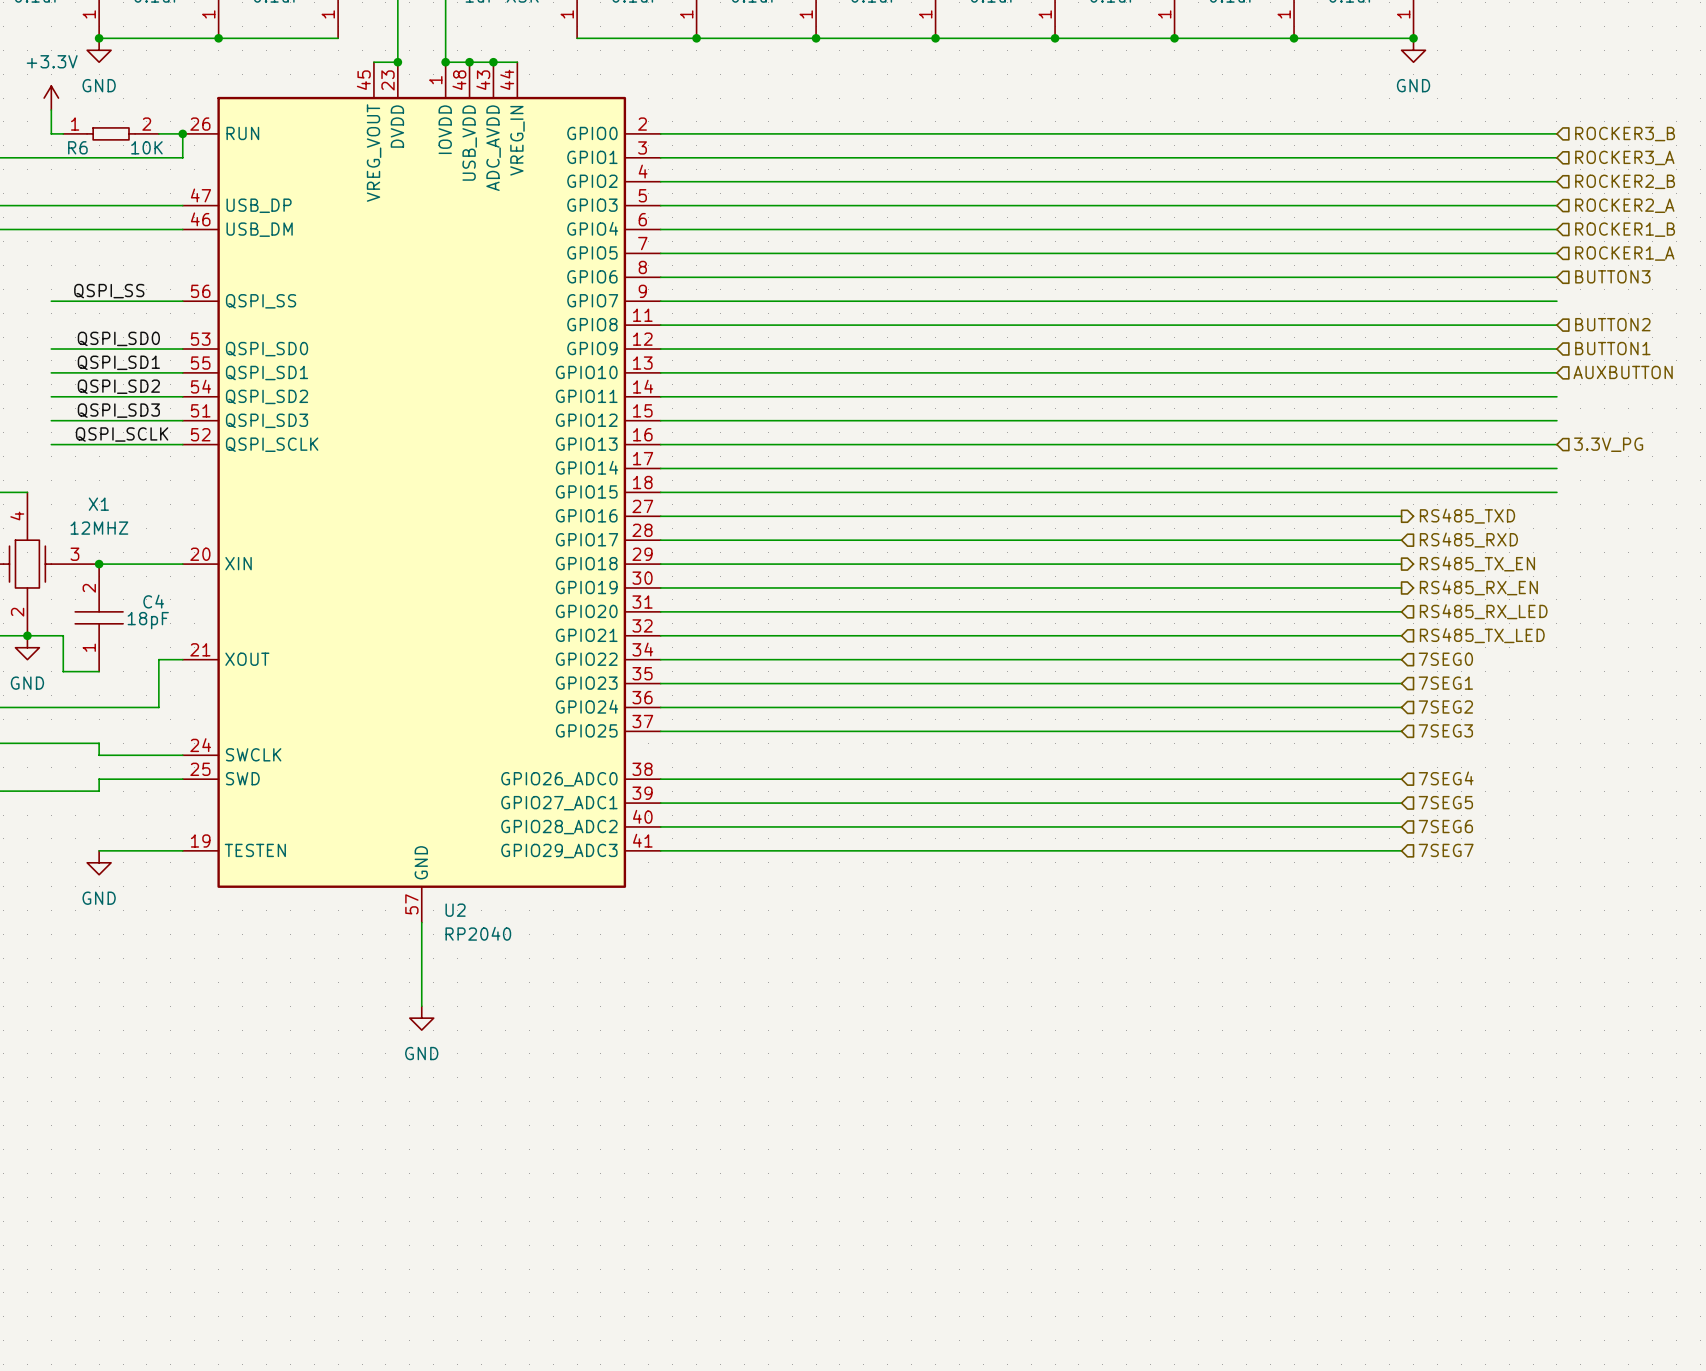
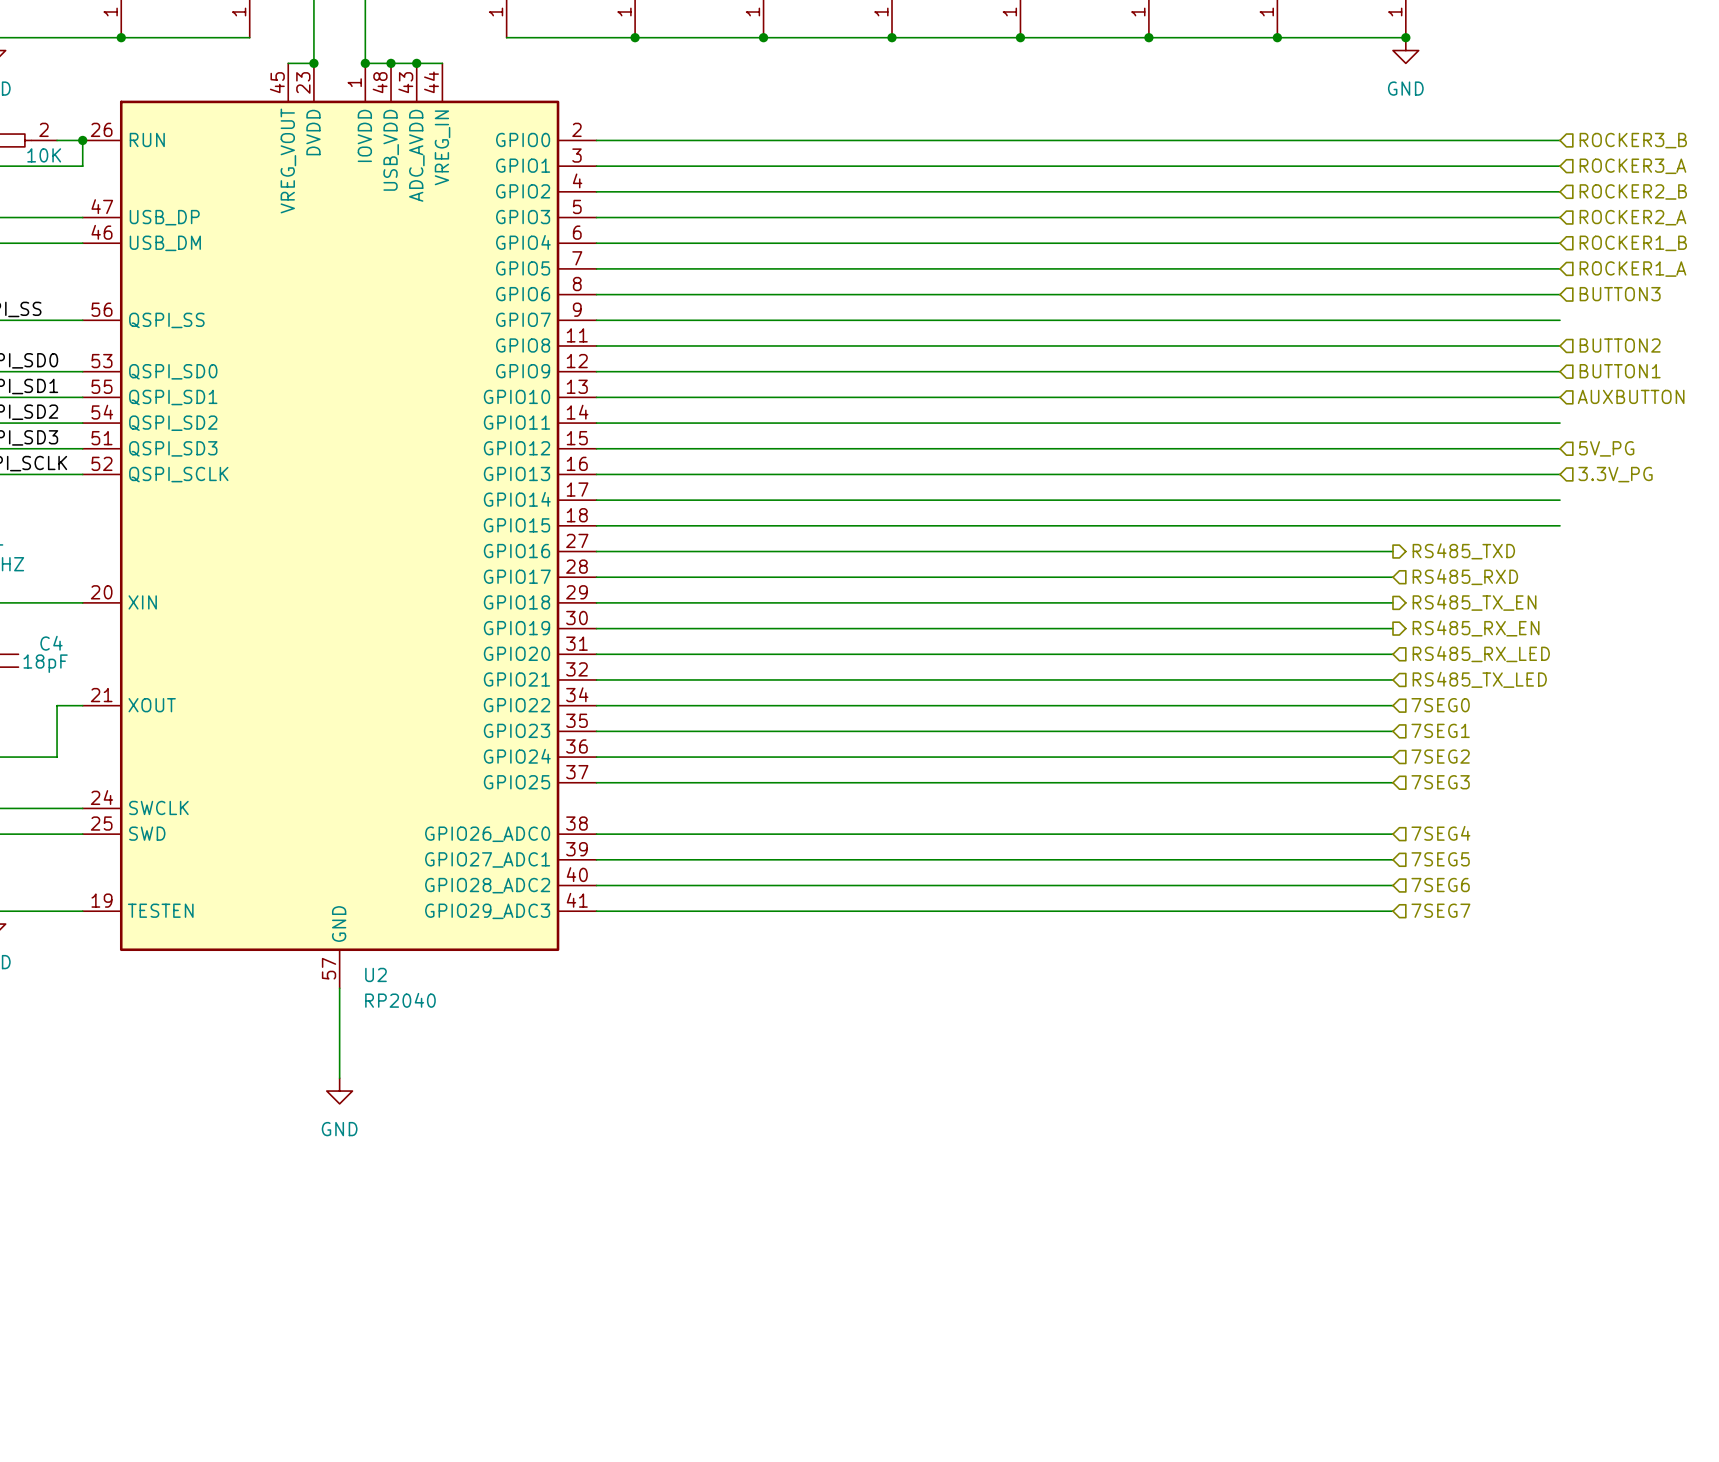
hierarchical label: none -> 5V_PG (1606, 448)

